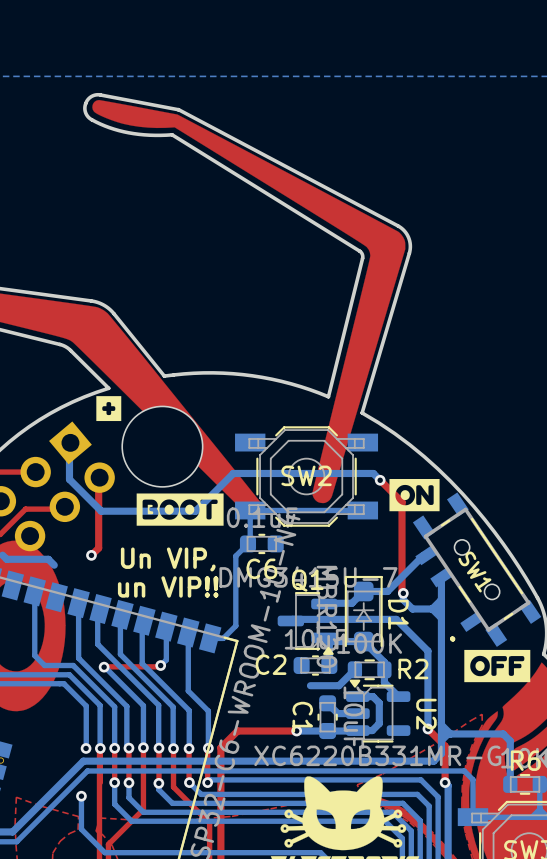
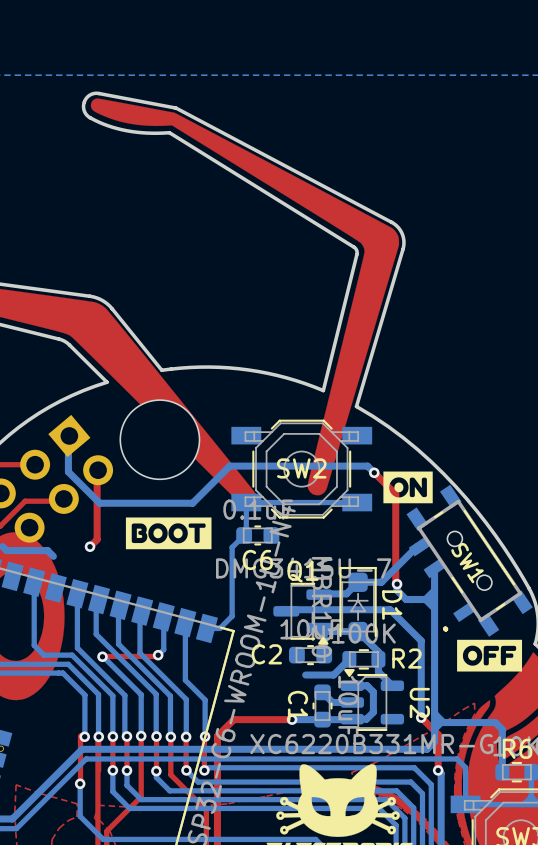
drawing: [96, 396, 122, 422] -> none
drawing position: (180, 509) -> (168, 533)
text: Un VIP, (168, 559) -> none
text: un VIP!! (168, 586) -> none
top track: none -> (80, 735) (80, 783)

